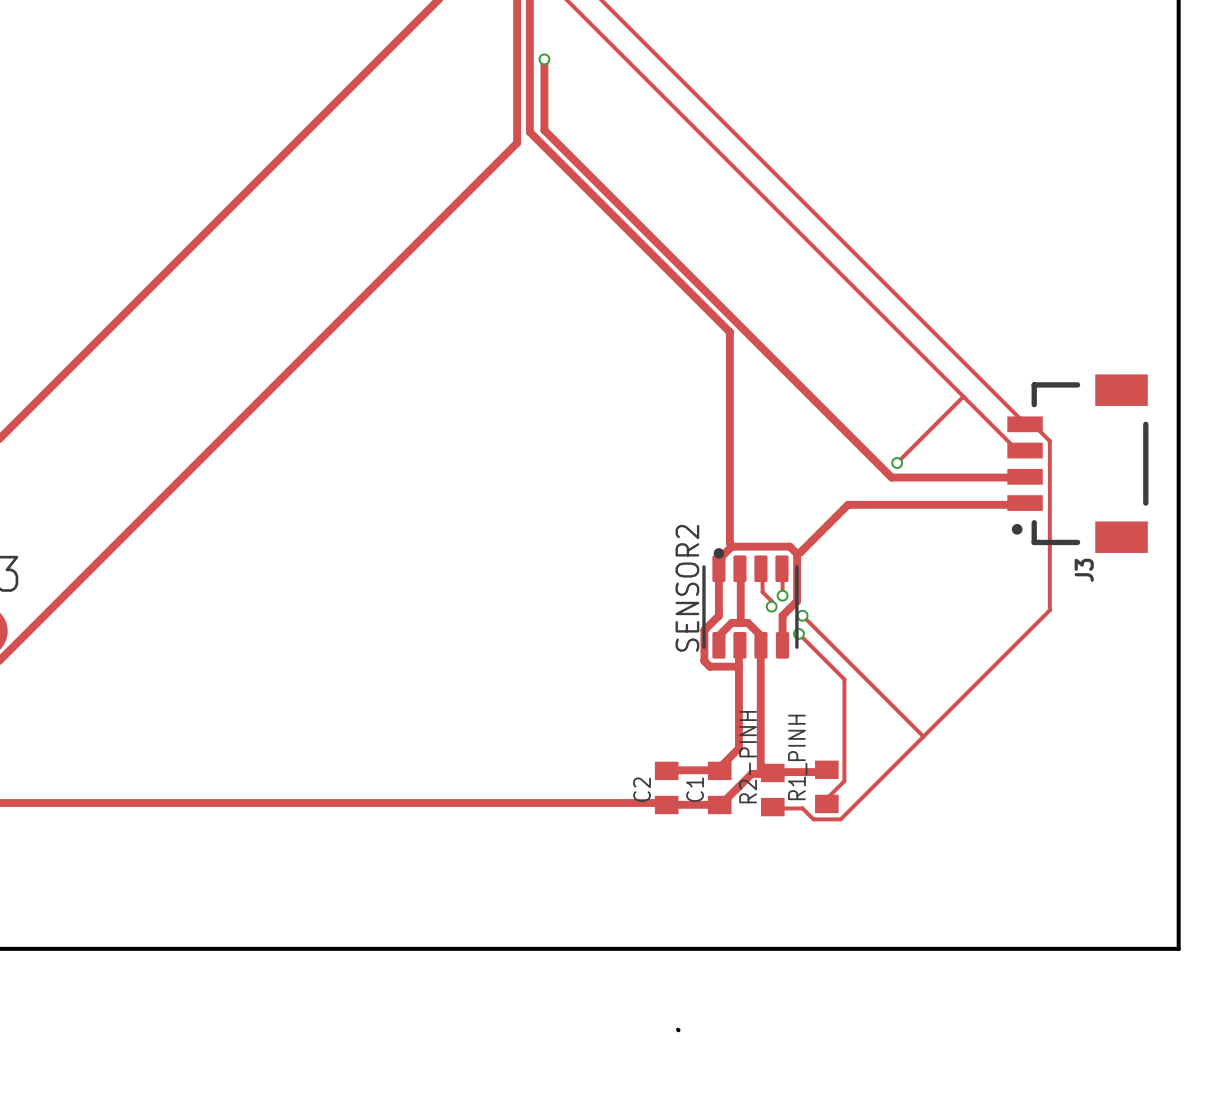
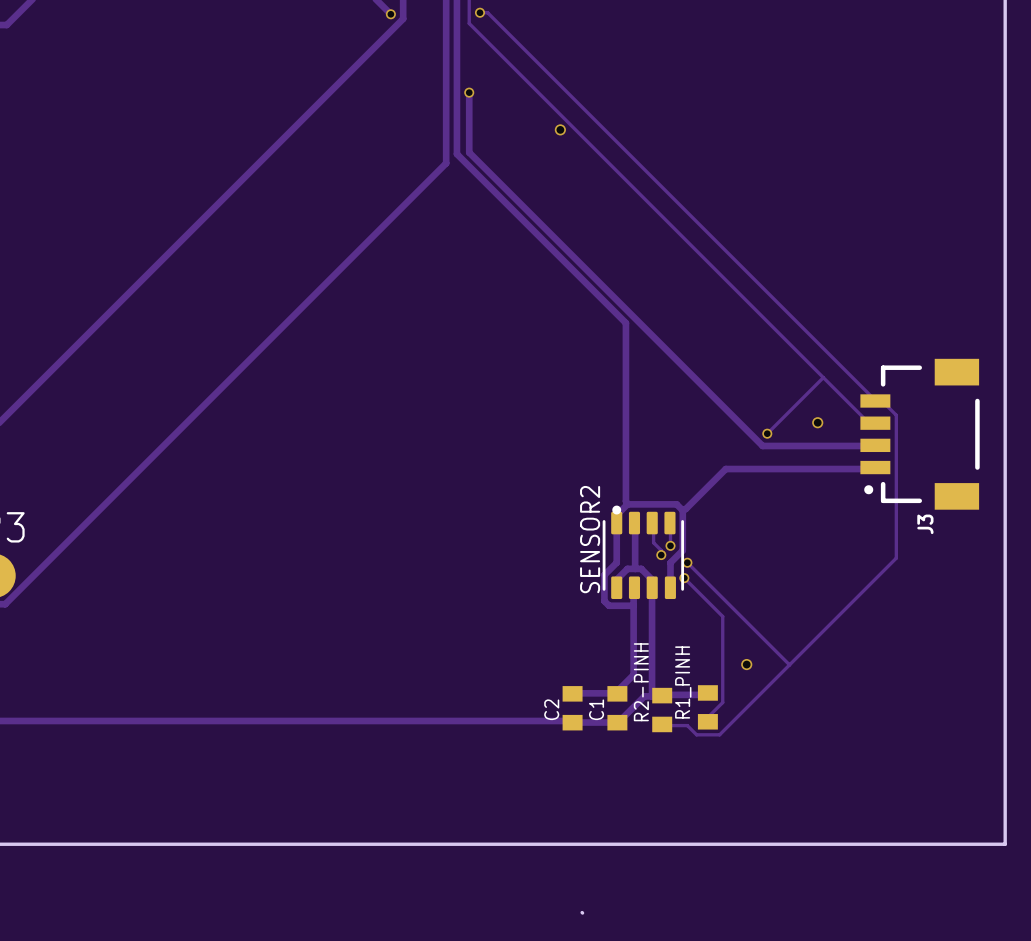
via: none -> (560, 129)
via: none -> (817, 422)
via: none -> (746, 664)

